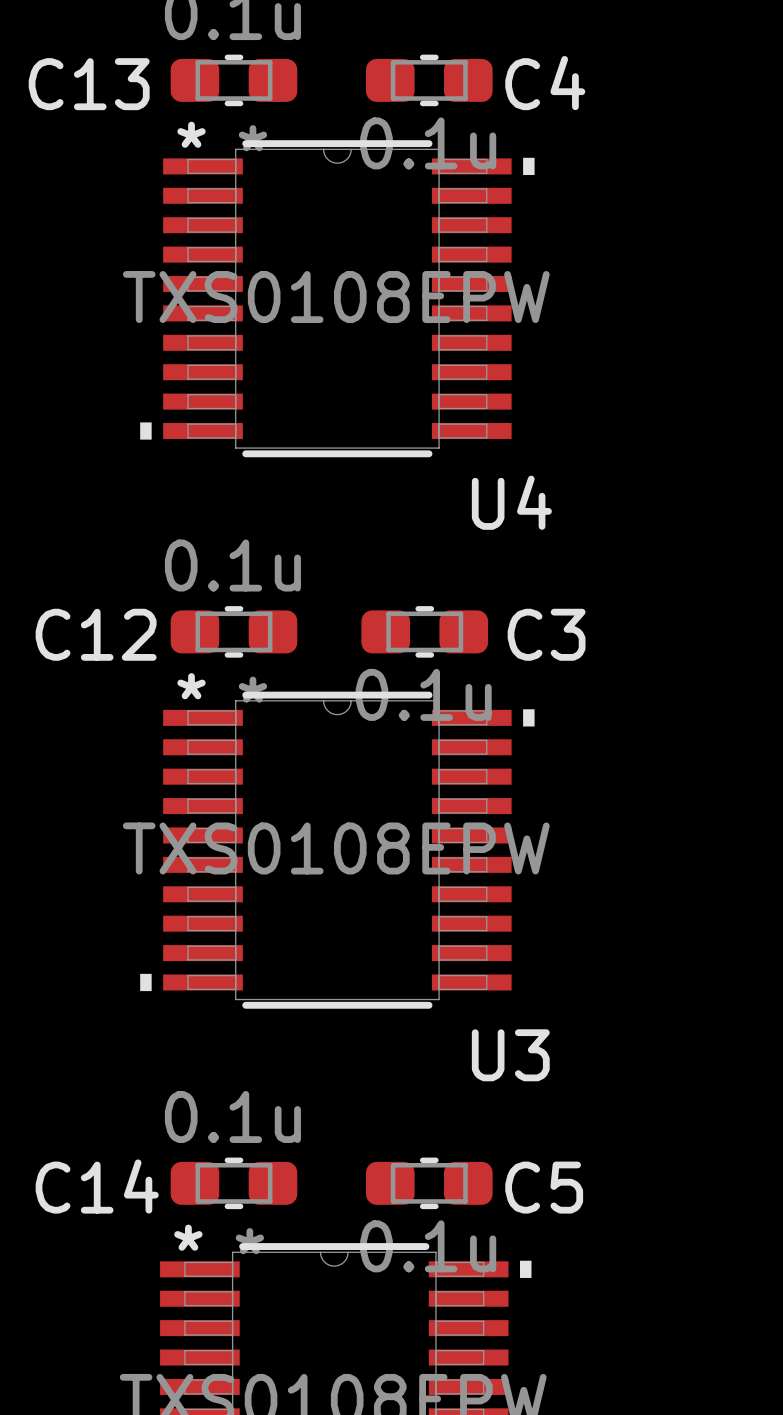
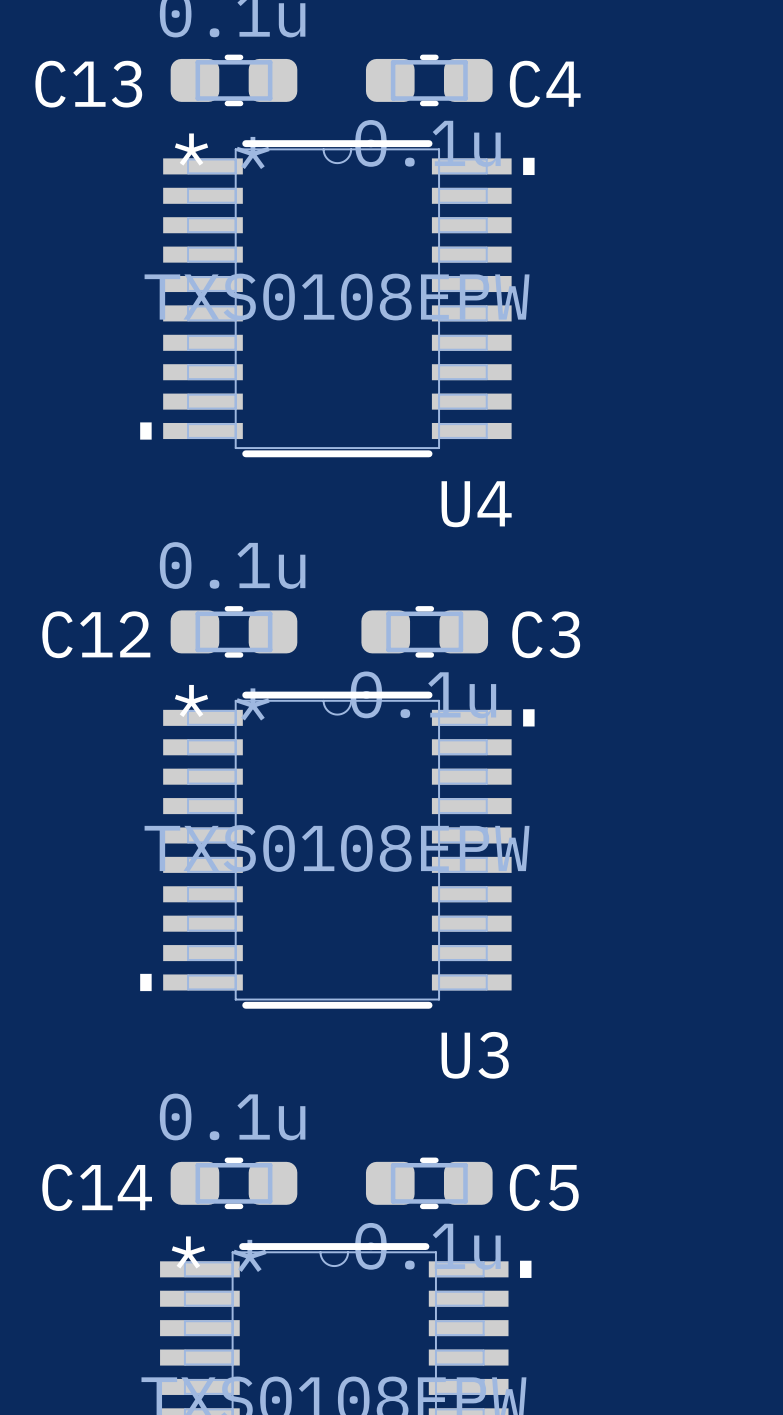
U4 name position: U4 (511, 502) -> U4 (476, 504)
U3 name position: U3 (510, 1055) -> U3 (475, 1055)

